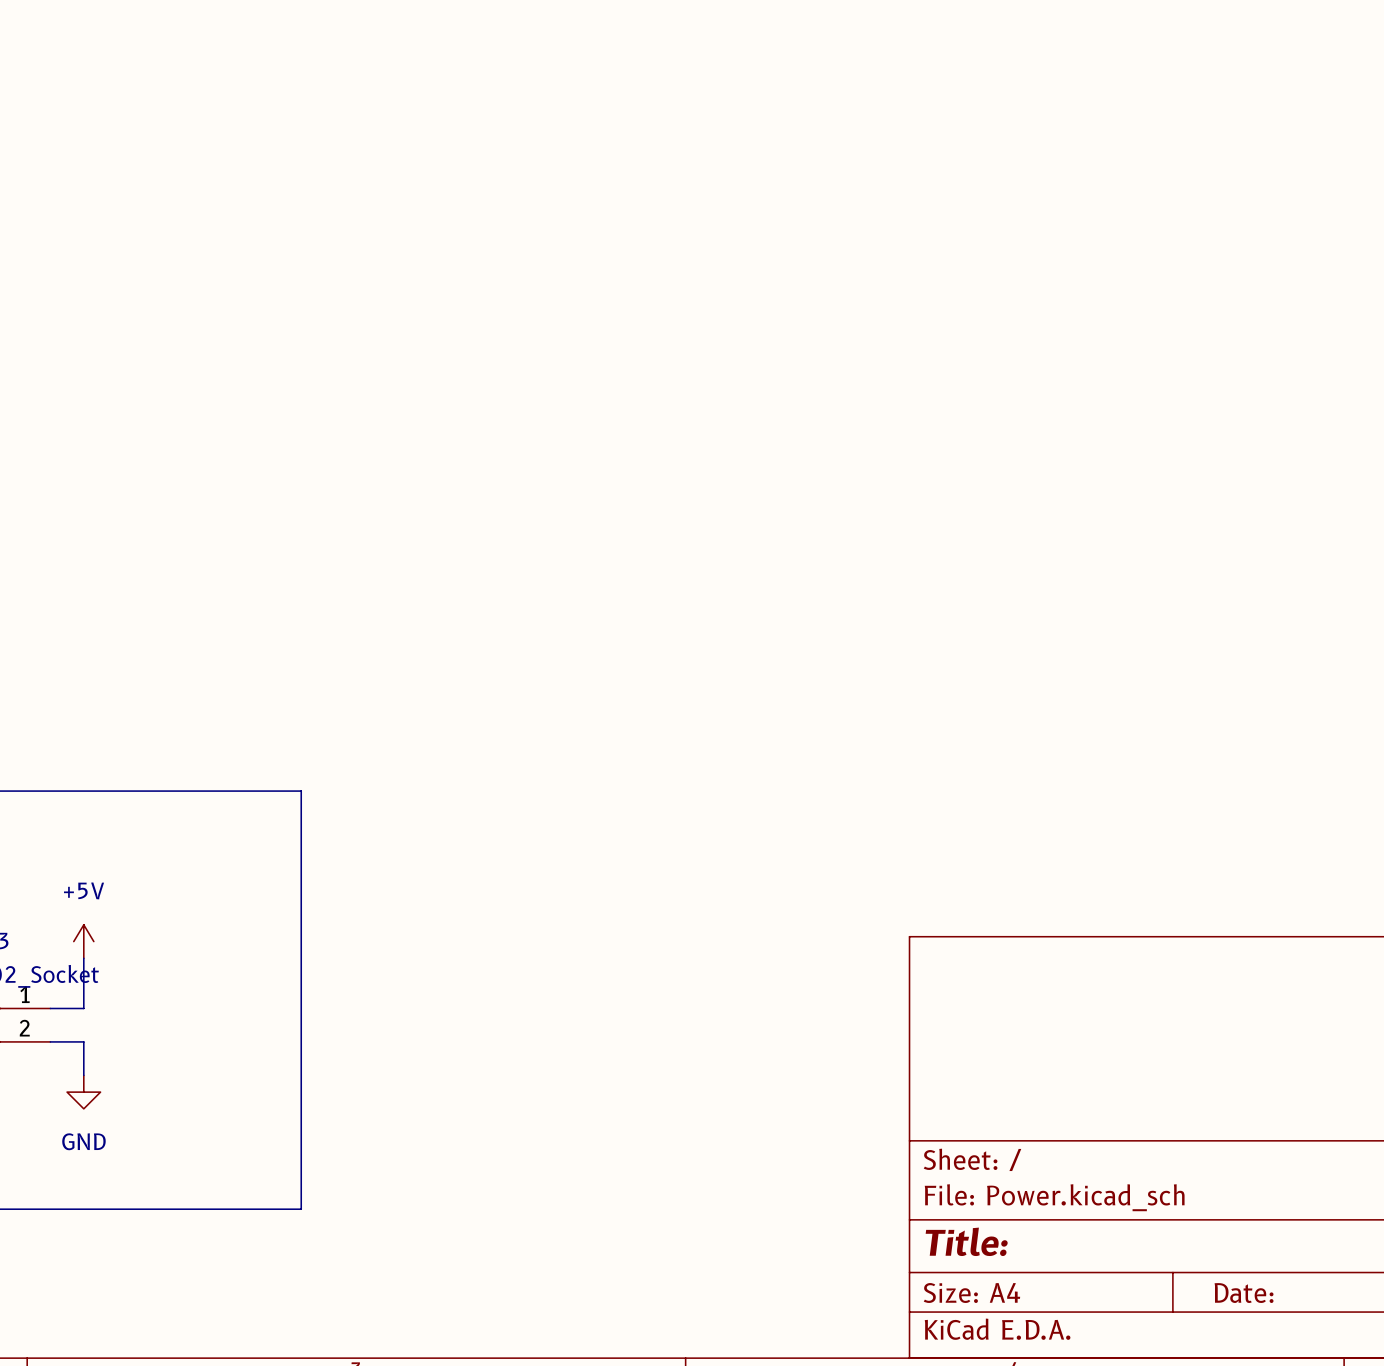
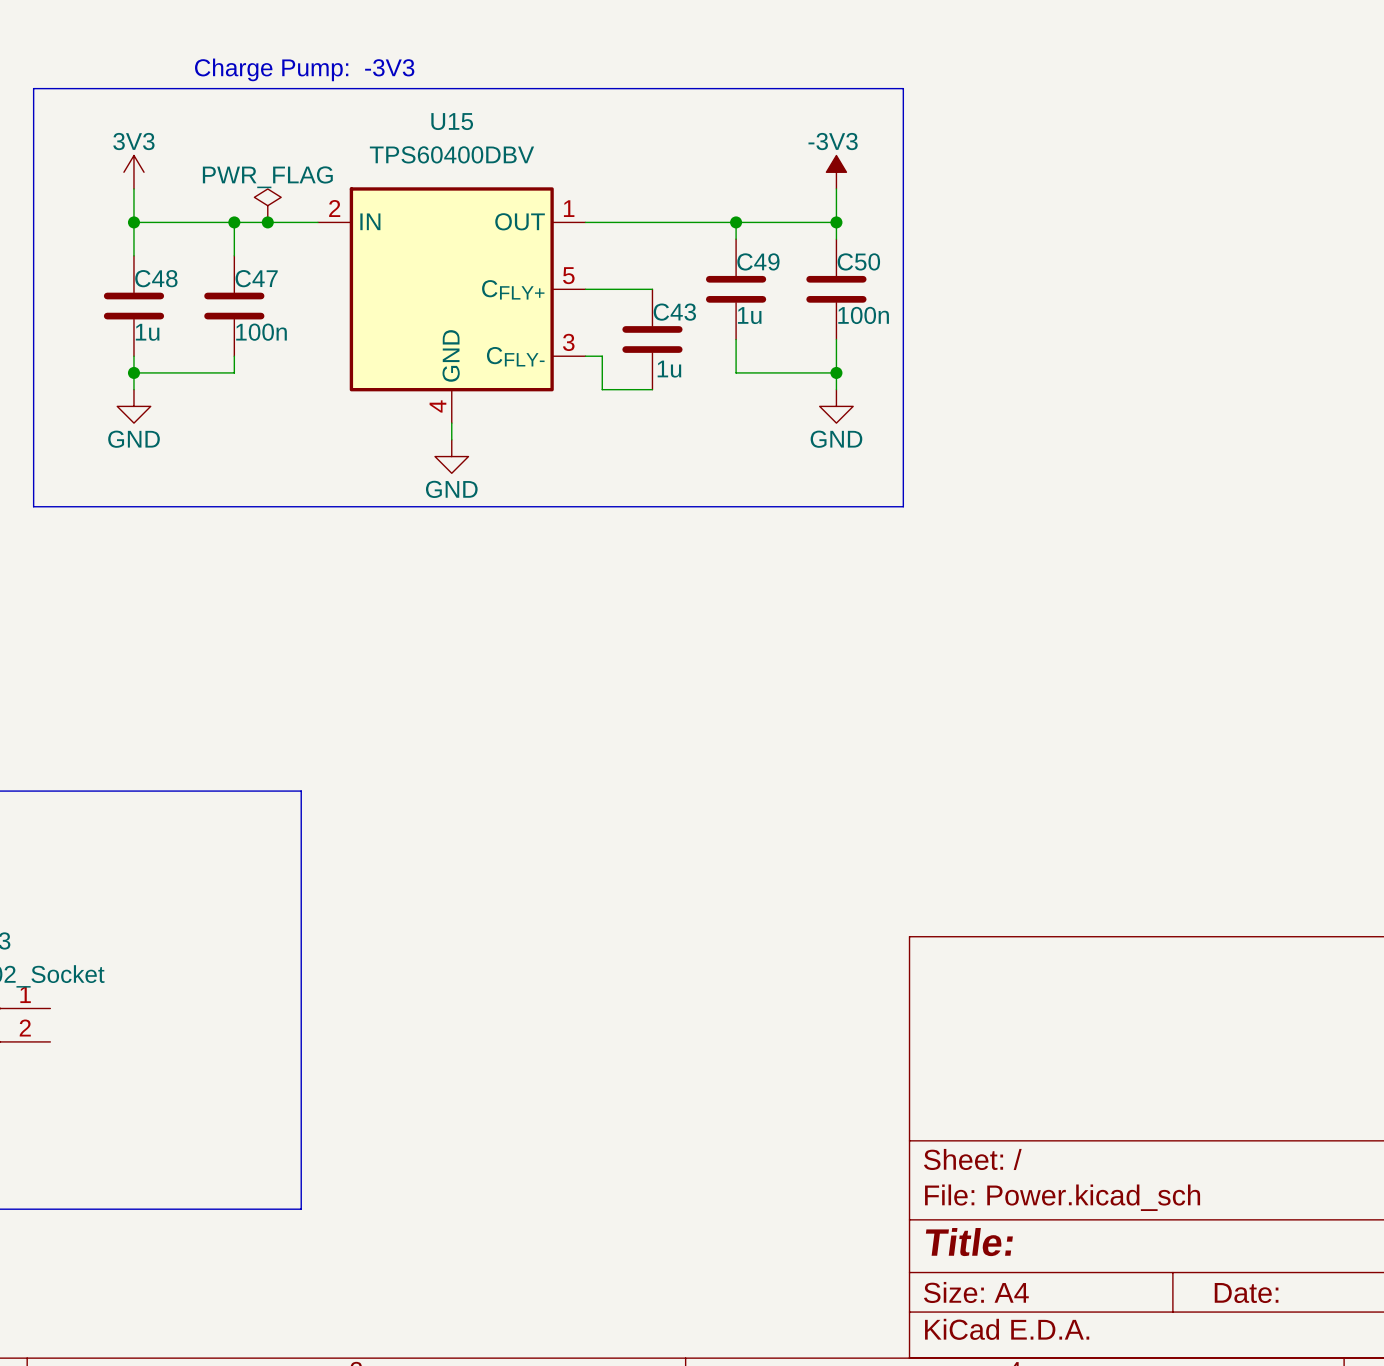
text: none -> Charge Pump: -3V3 (304, 69)
line: none -> (33, 88) (903, 88) (903, 506) (33, 506) (33, 88)
power symbol: none -> 3V3 (133, 172)
power symbol: none -> -3V3 (836, 172)
wire: none -> (133, 188) (133, 255)
wire: none -> (836, 188) (836, 239)
power symbol: none -> PWR_FLAG (267, 205)
wire: none -> (133, 222) (317, 222)
junction: none -> (133, 222)
wire: none -> (234, 222) (234, 255)
junction: none -> (234, 222)
junction: none -> (267, 222)
wire: none -> (585, 222) (836, 222)
wire: none -> (736, 222) (736, 239)
junction: none -> (736, 222)
junction: none -> (836, 222)
wire: none -> (585, 289) (652, 289)
C49: none -> 1u (736, 289)
C50: none -> 100n (836, 289)
U15: none -> TPS60400DBV (451, 305)
C48: none -> 1u (133, 306)
C47: none -> 100n (234, 306)
C43: none -> 1u (652, 339)
wire: none -> (736, 339) (736, 372) (836, 372)
wire: none -> (836, 339) (836, 389)
wire: none -> (133, 356) (133, 389)
wire: none -> (234, 356) (234, 372) (133, 372)
wire: none -> (585, 356) (602, 356) (602, 389) (652, 389)
junction: none -> (133, 372)
junction: none -> (836, 372)
power symbol: none -> GND (133, 406)
power symbol: none -> GND (836, 406)
wire: none -> (451, 423) (451, 439)
power symbol: none -> GND (451, 456)
power symbol: +5V (83, 941) -> none
wire: (83, 958) (83, 1008) (50, 1008) -> none
wire: (50, 1041) (83, 1041) (83, 1075) -> none
power symbol: GND (83, 1092) -> none

